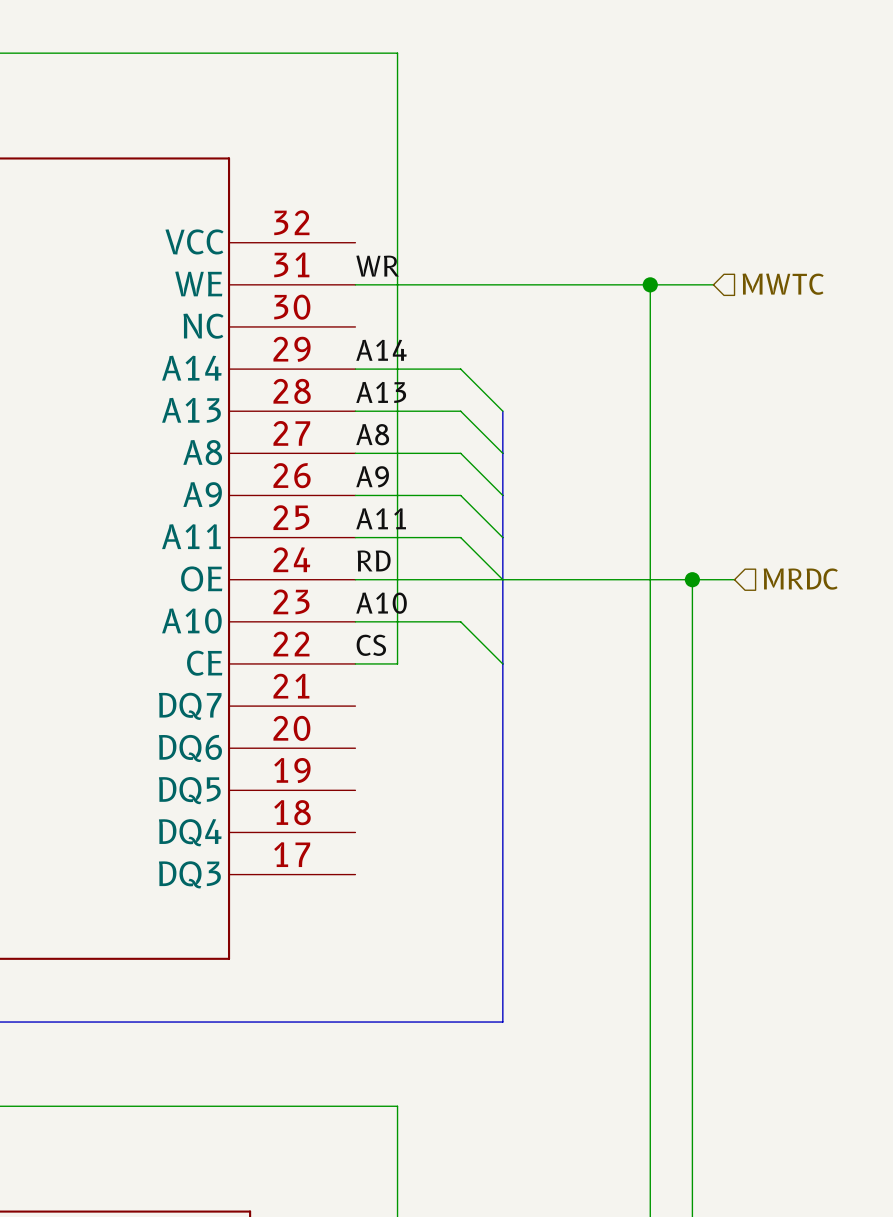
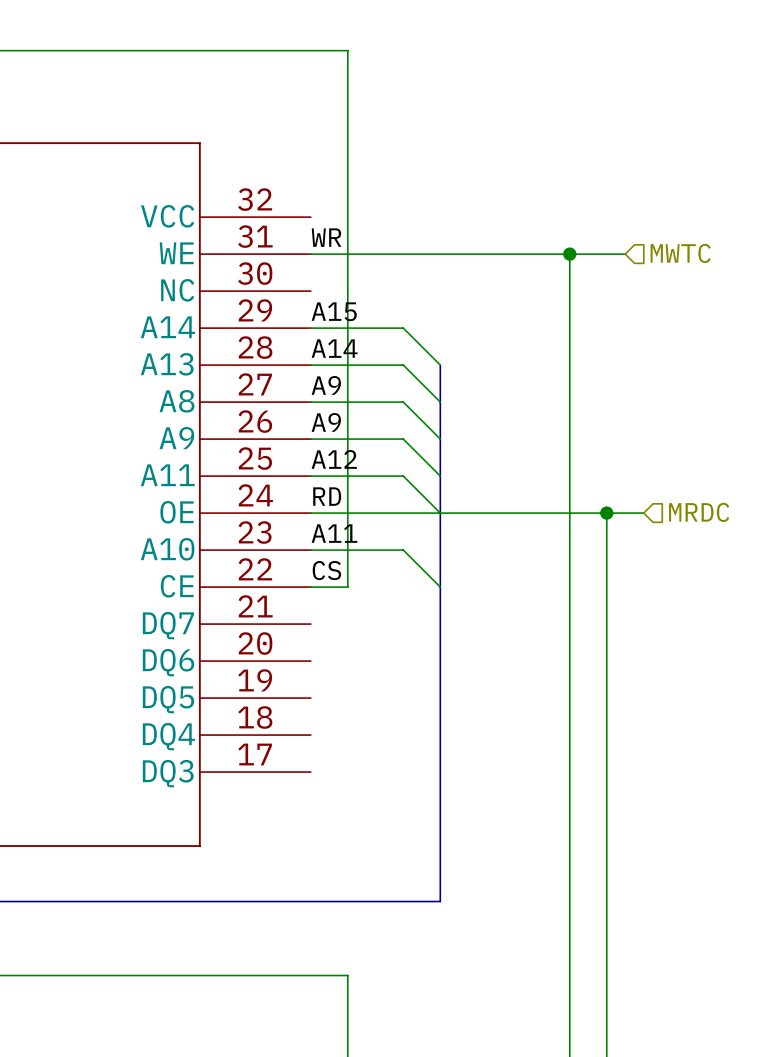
label: A14 (381, 350) -> A15 (334, 311)
label: A13 (381, 392) -> A14 (334, 348)
label: A8 (372, 434) -> A9 (326, 385)
label: A11 (381, 518) -> A12 (334, 459)
label: A10 (381, 603) -> A11 (334, 533)

